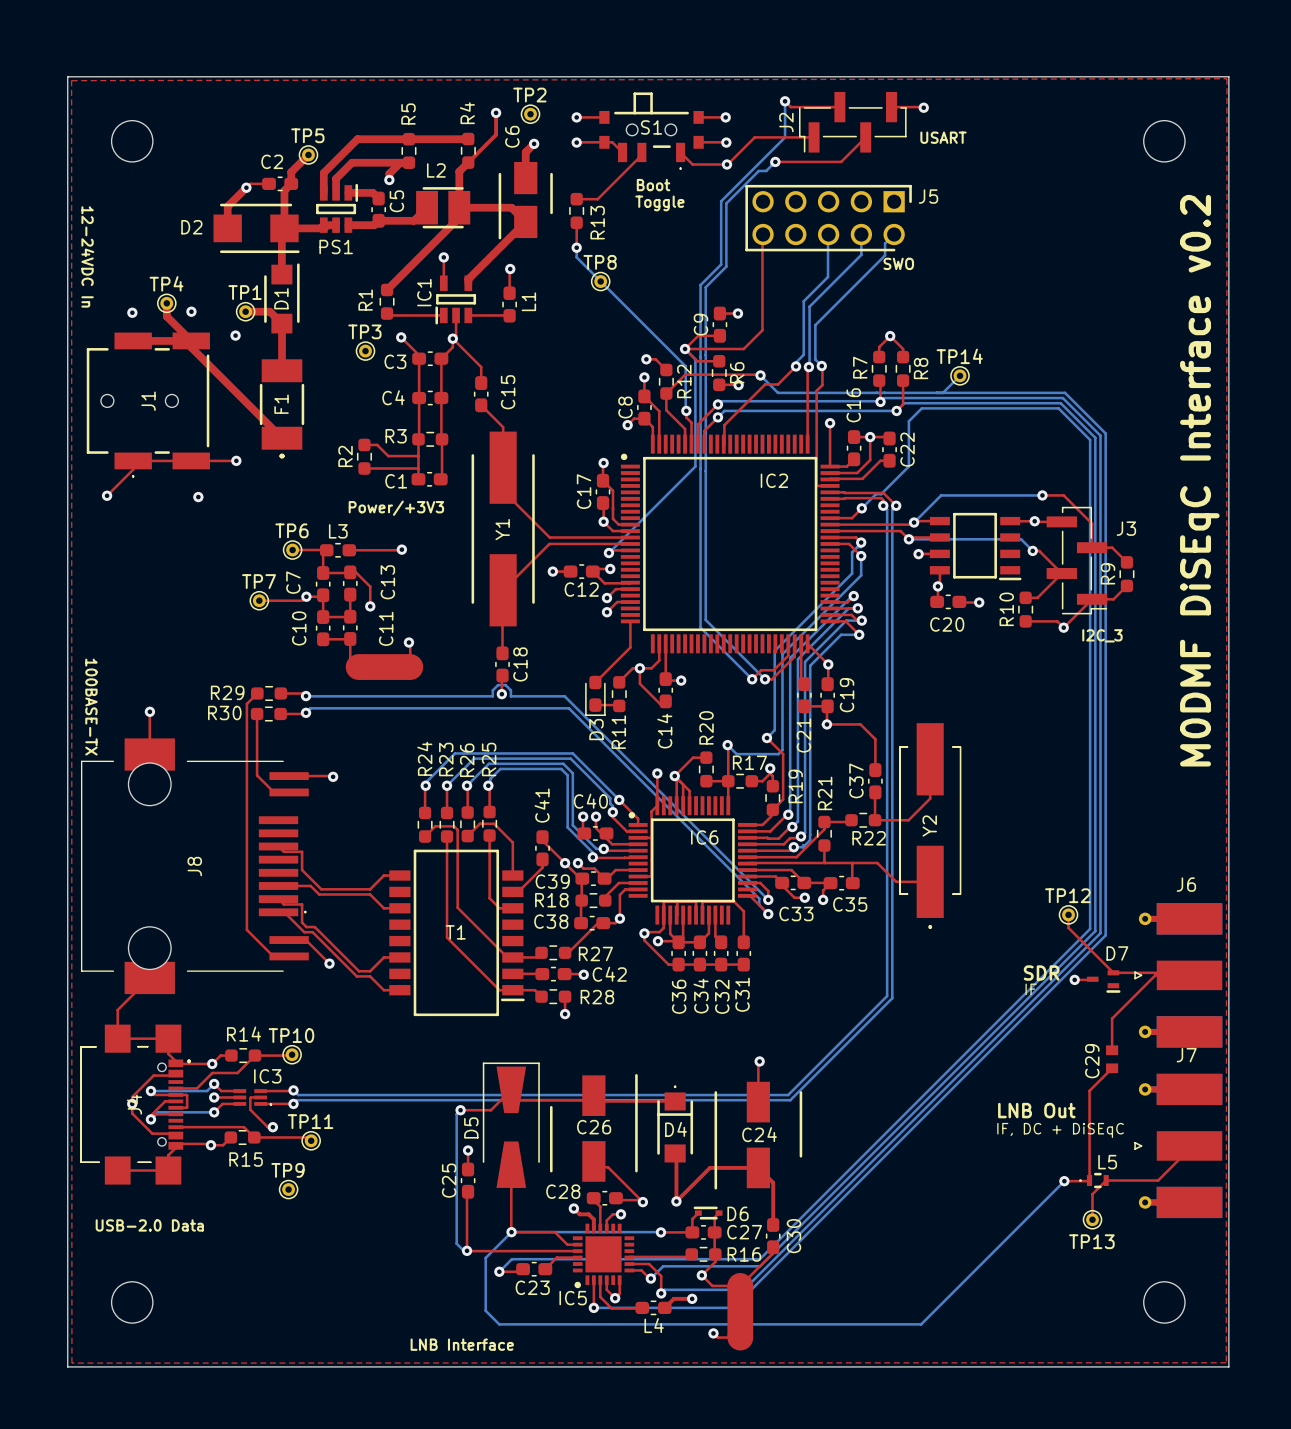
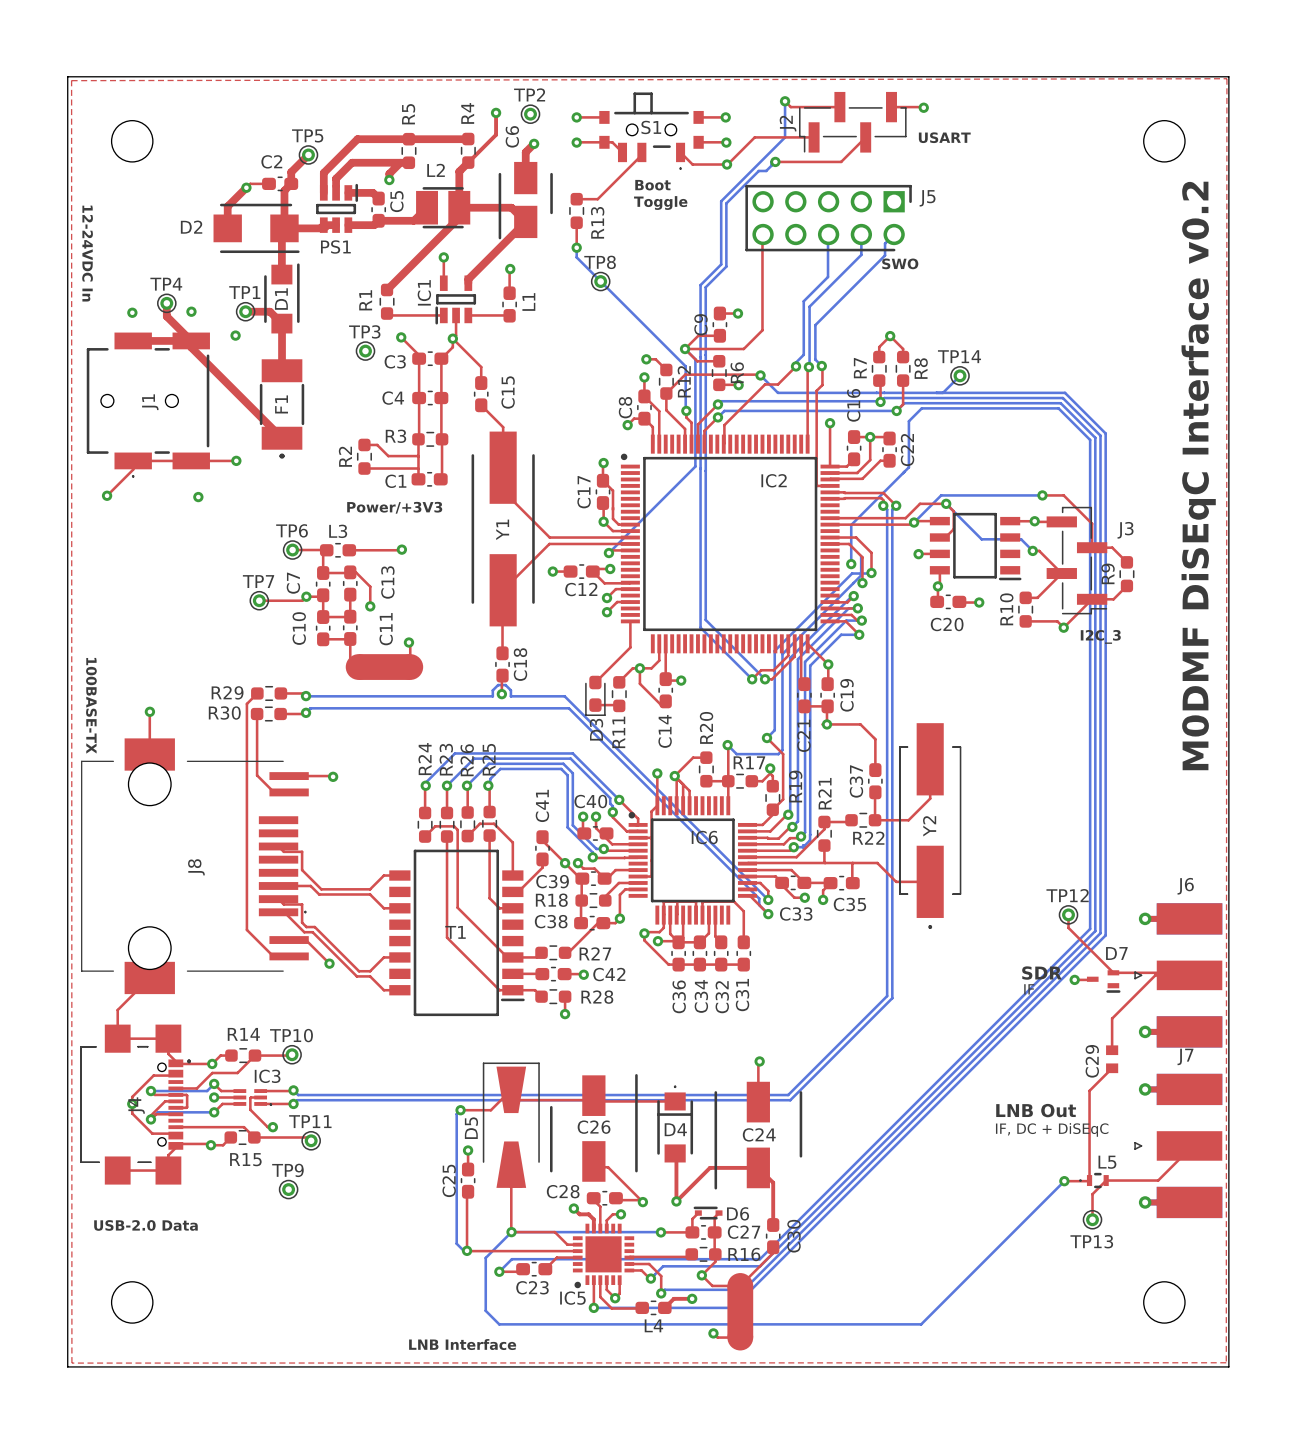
bottom track: (908, 466) (881, 494) (876, 494) (862, 508) -> (908, 466) (851, 525) (851, 564)
via: none -> (946, 503)
top track: (861, 508) (851, 518) -> none
via: (861, 508) -> none
top track: (830, 531) (900, 531) (908, 539) (910, 537) (939, 537) -> (851, 518) (905, 518) (919, 503) (946, 503) (953, 511) (953, 529) (945, 537) (939, 537)
bottom track: (908, 539) (981, 539) -> (946, 503) (981, 539)
via: (908, 539) -> none
top track: none -> (861, 542) (871, 552) (871, 572)
bottom track: (861, 542) (861, 547) (857, 547) (852, 552) (852, 573) -> (871, 572) (852, 573)
via: (861, 542) -> none
top track: none -> (861, 556) (862, 583)
via position: (861, 556) -> (851, 564)
via: none -> (871, 572)
via: none -> (862, 583)

